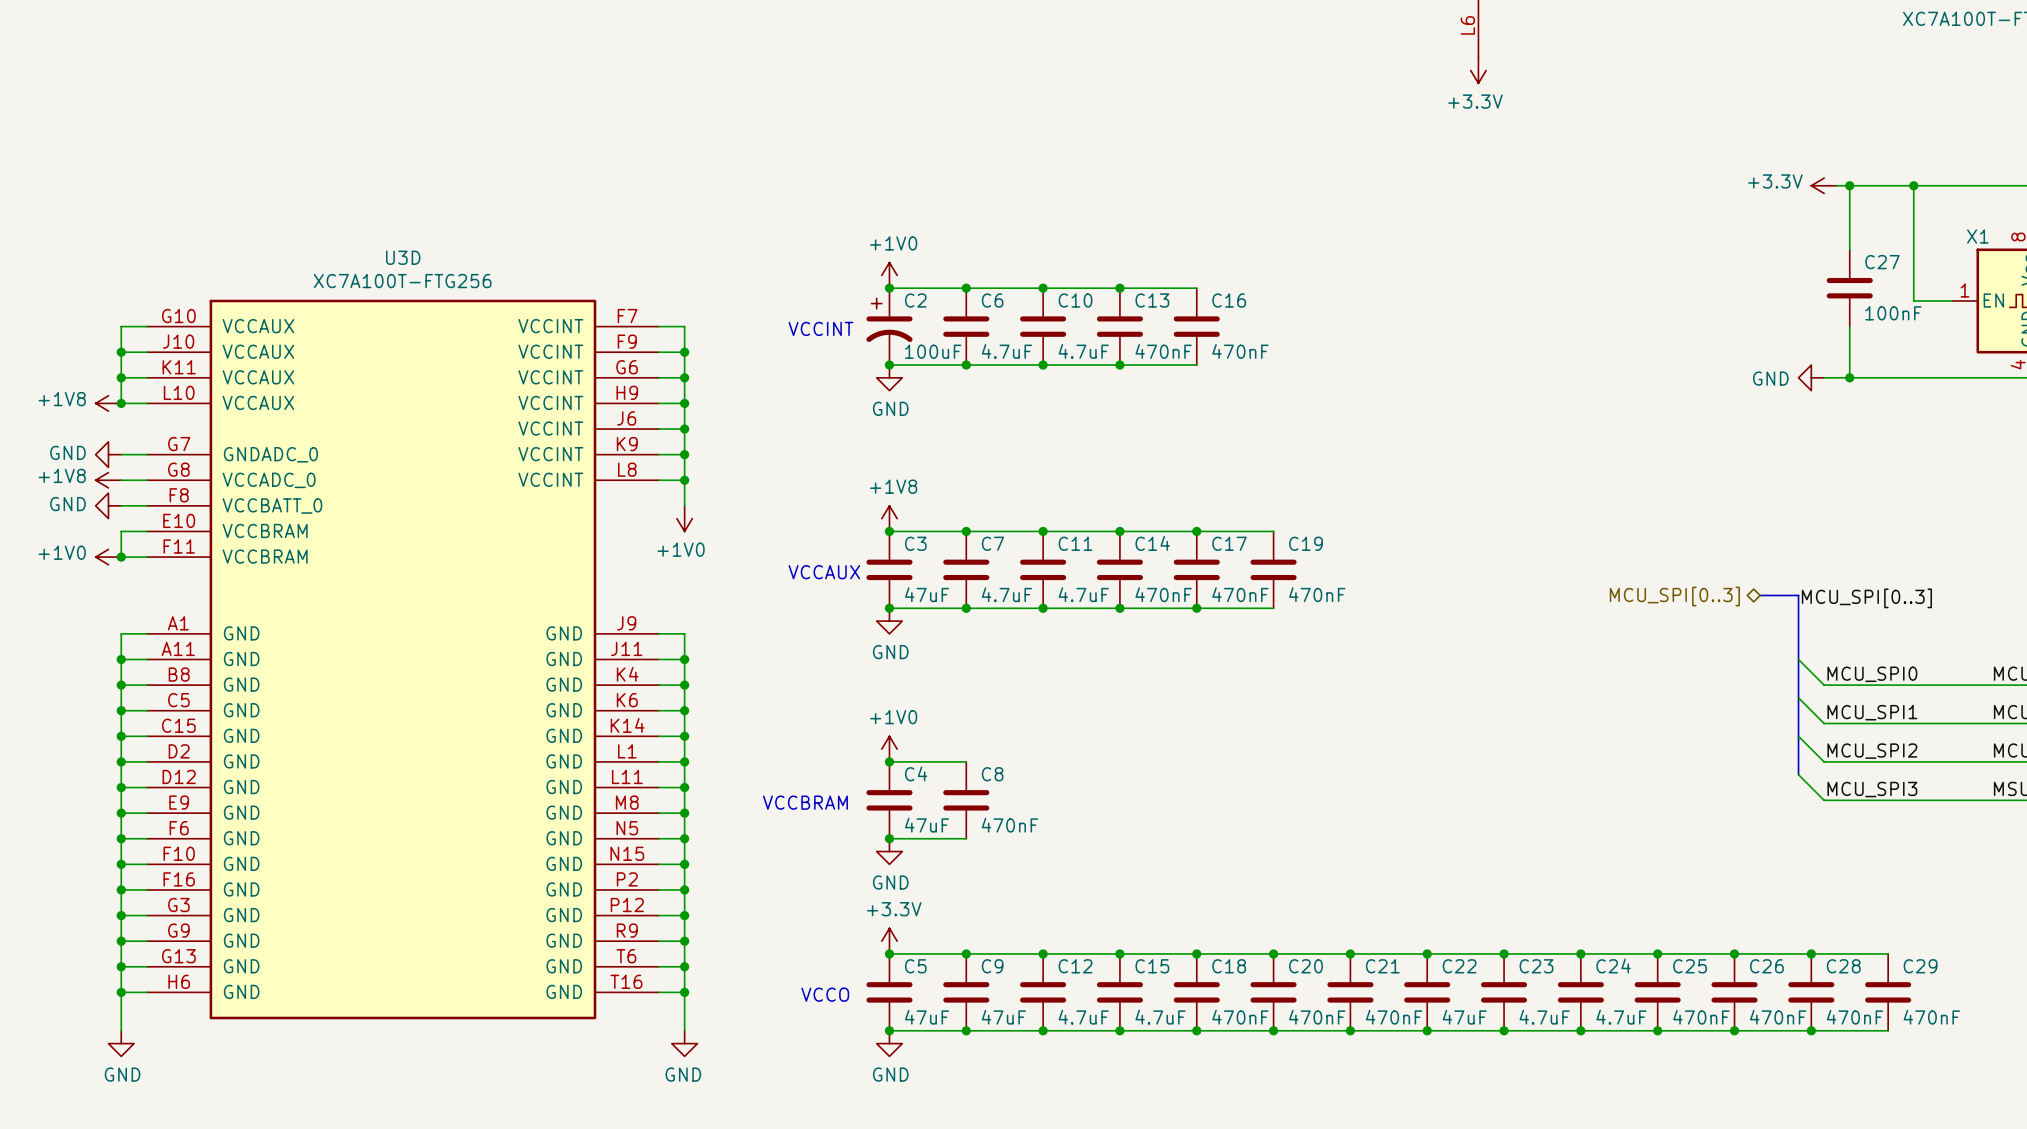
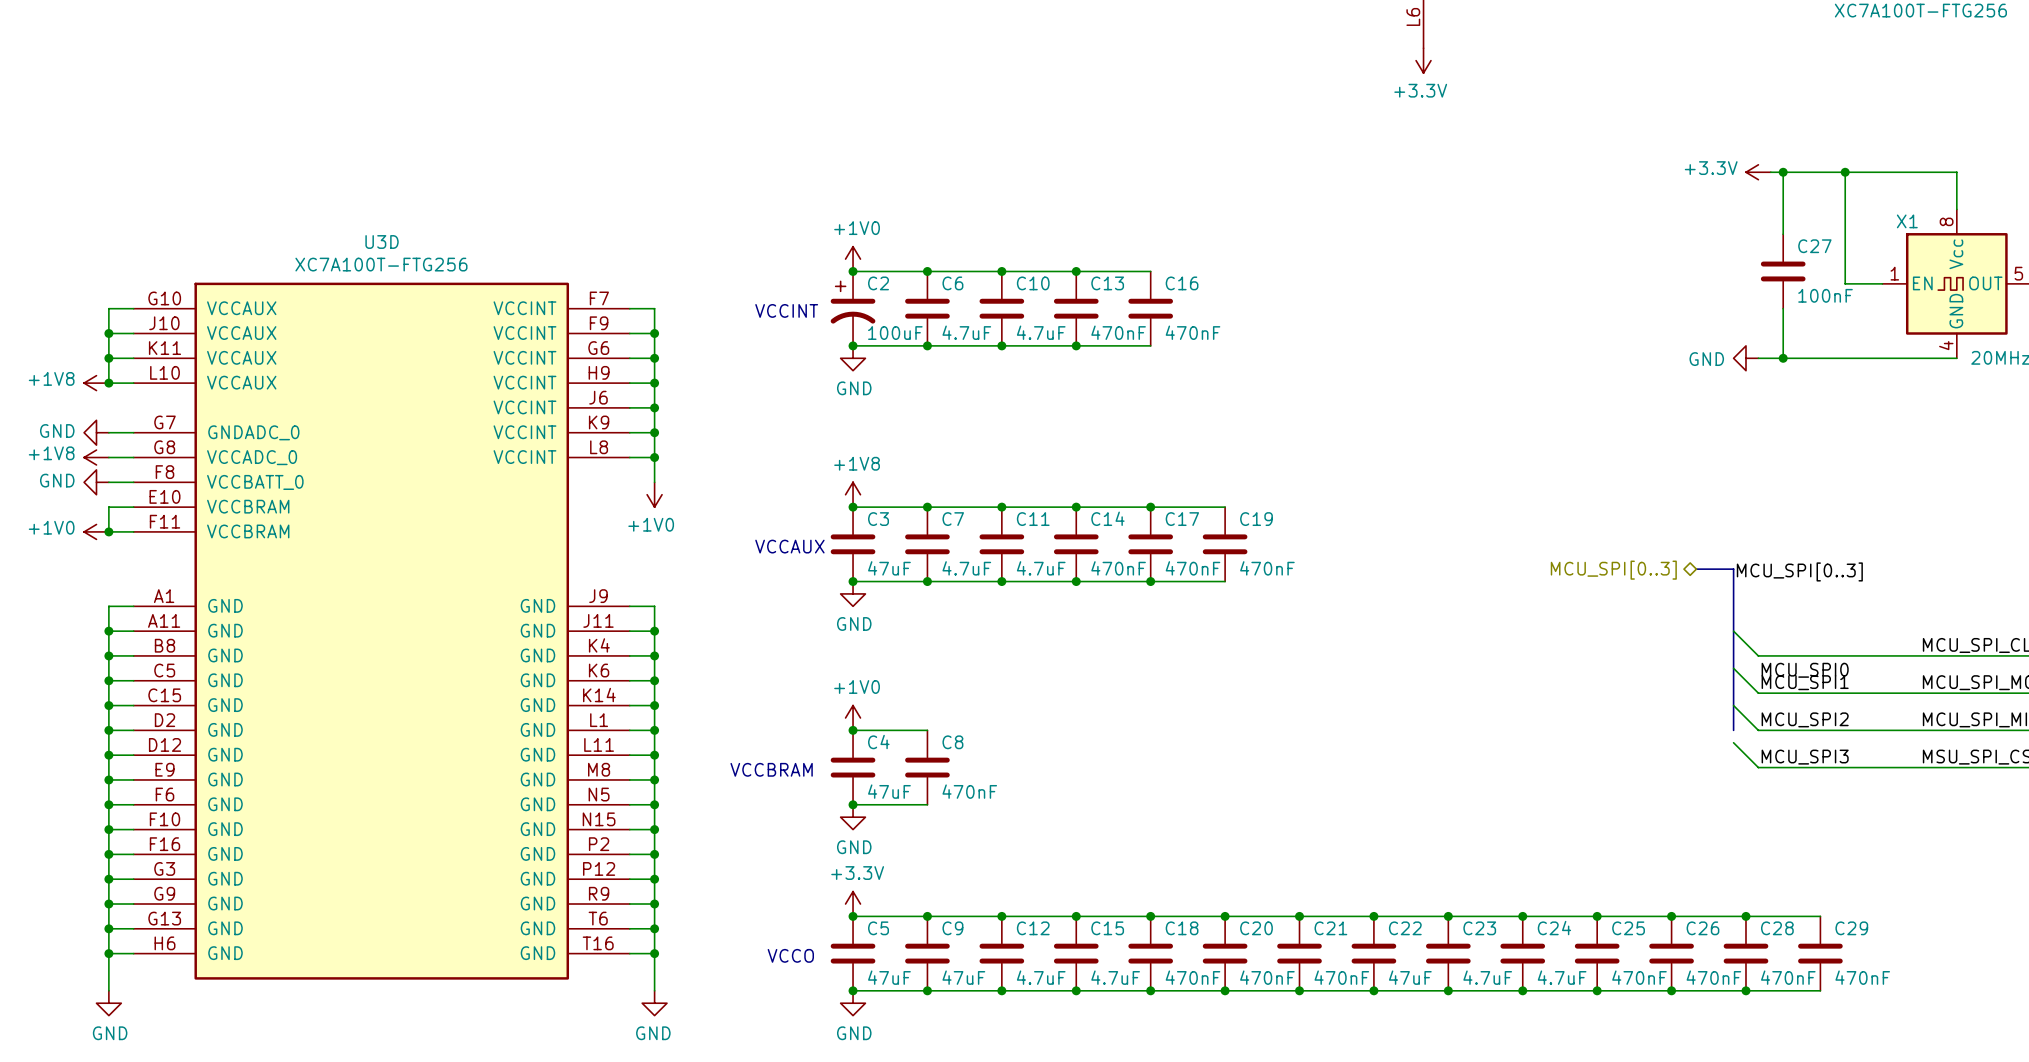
label position: MCU_SPI0 (1872, 674) -> MCU_SPI0 (1805, 670)
bus: (1798, 761) (1798, 774) -> none

